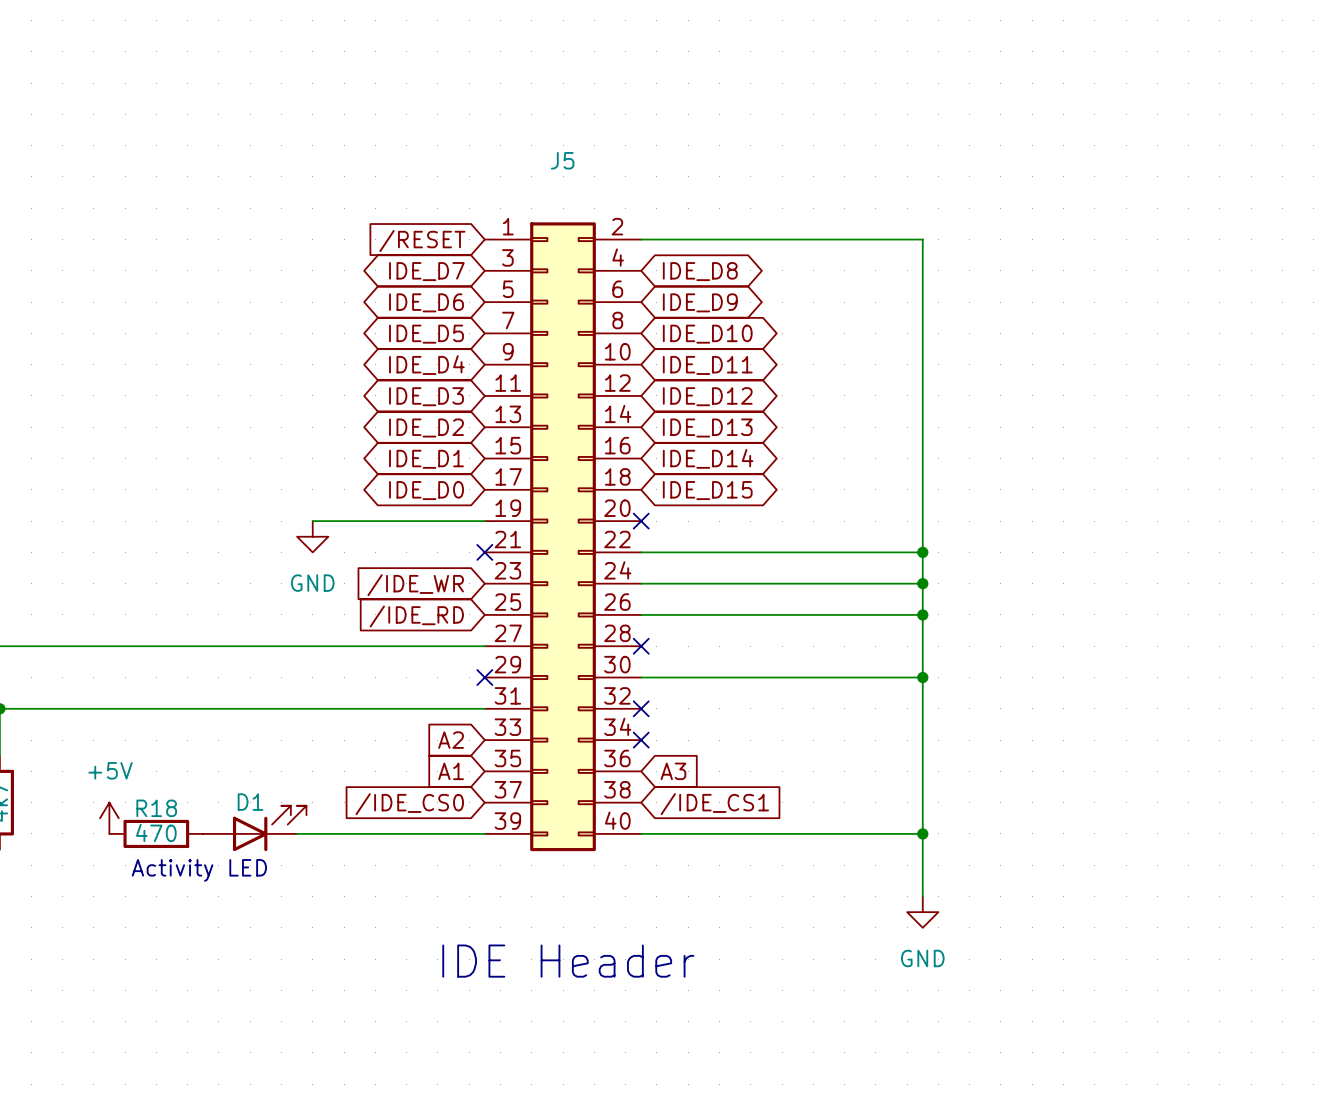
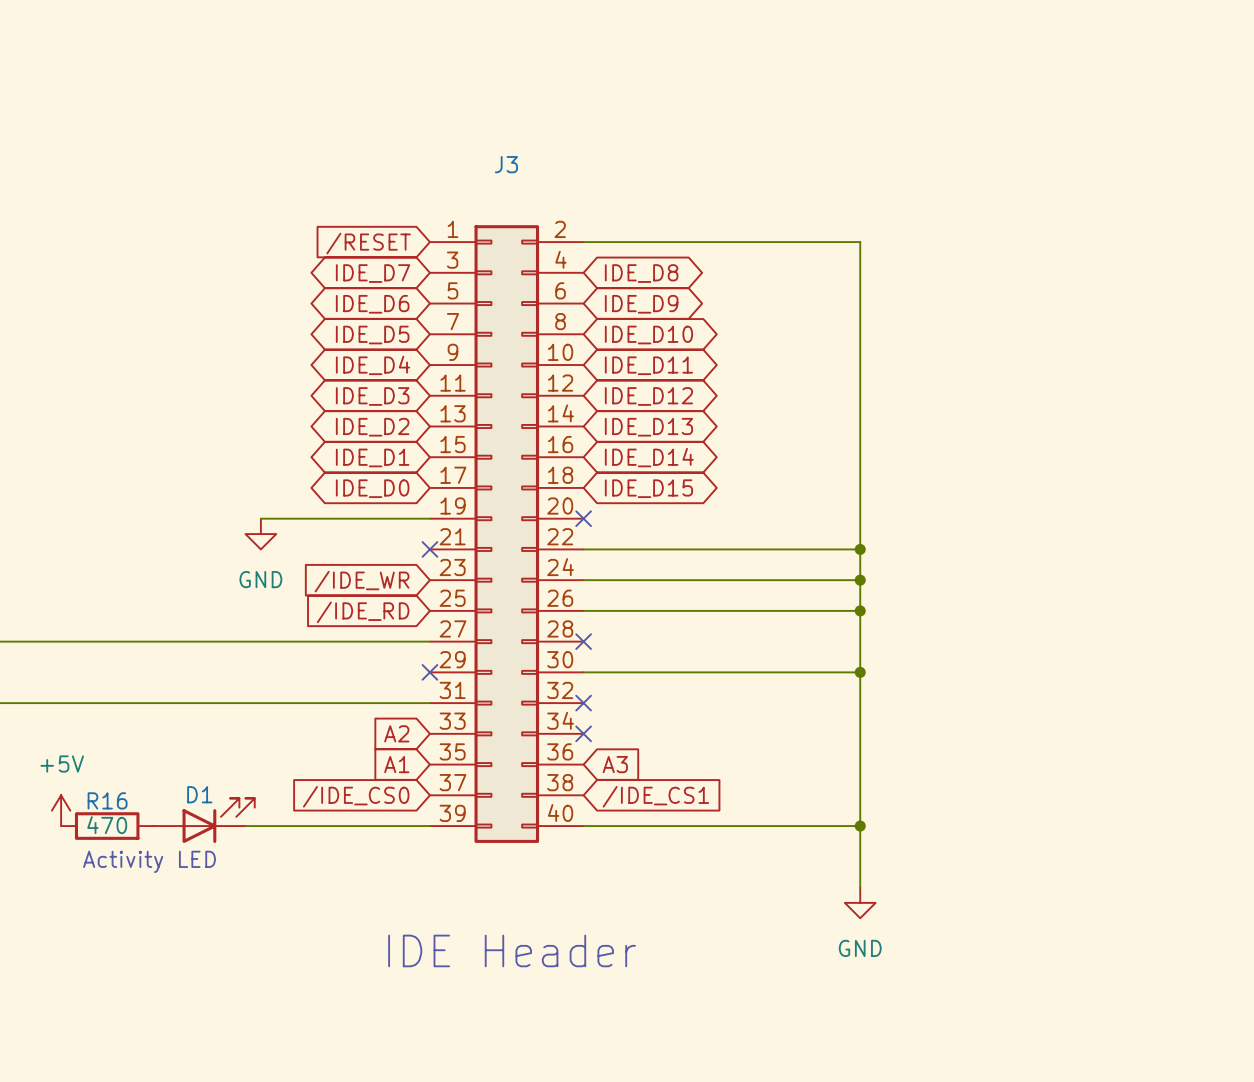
J5 name: J5 (562, 160) -> J3 (506, 164)
R18 name: R18 (156, 808) -> R16 (107, 800)

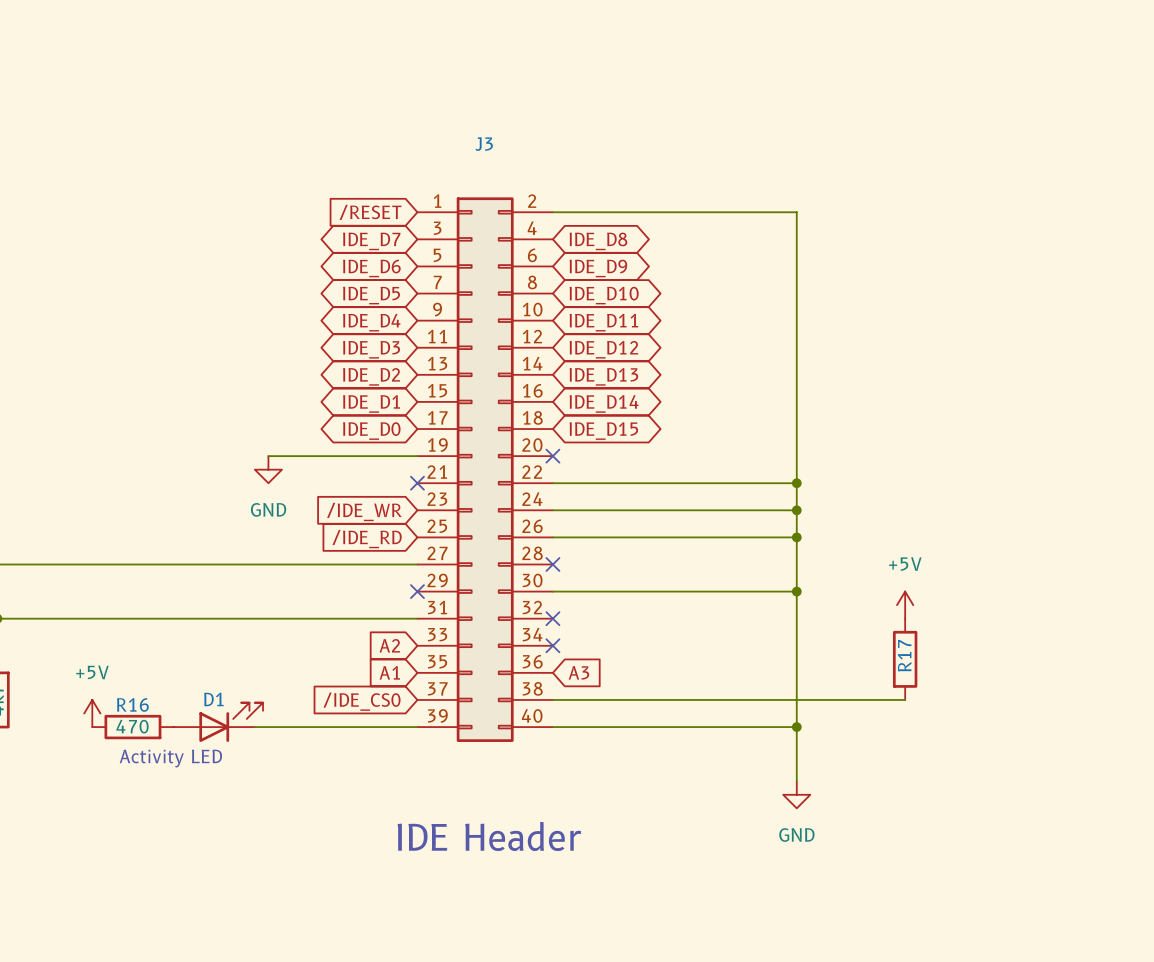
power symbol: none -> +5V (905, 605)
R17: none -> (905, 659)
wire: none -> (552, 699) (905, 699)
global label: /IDE_CS1 (655, 796) -> none

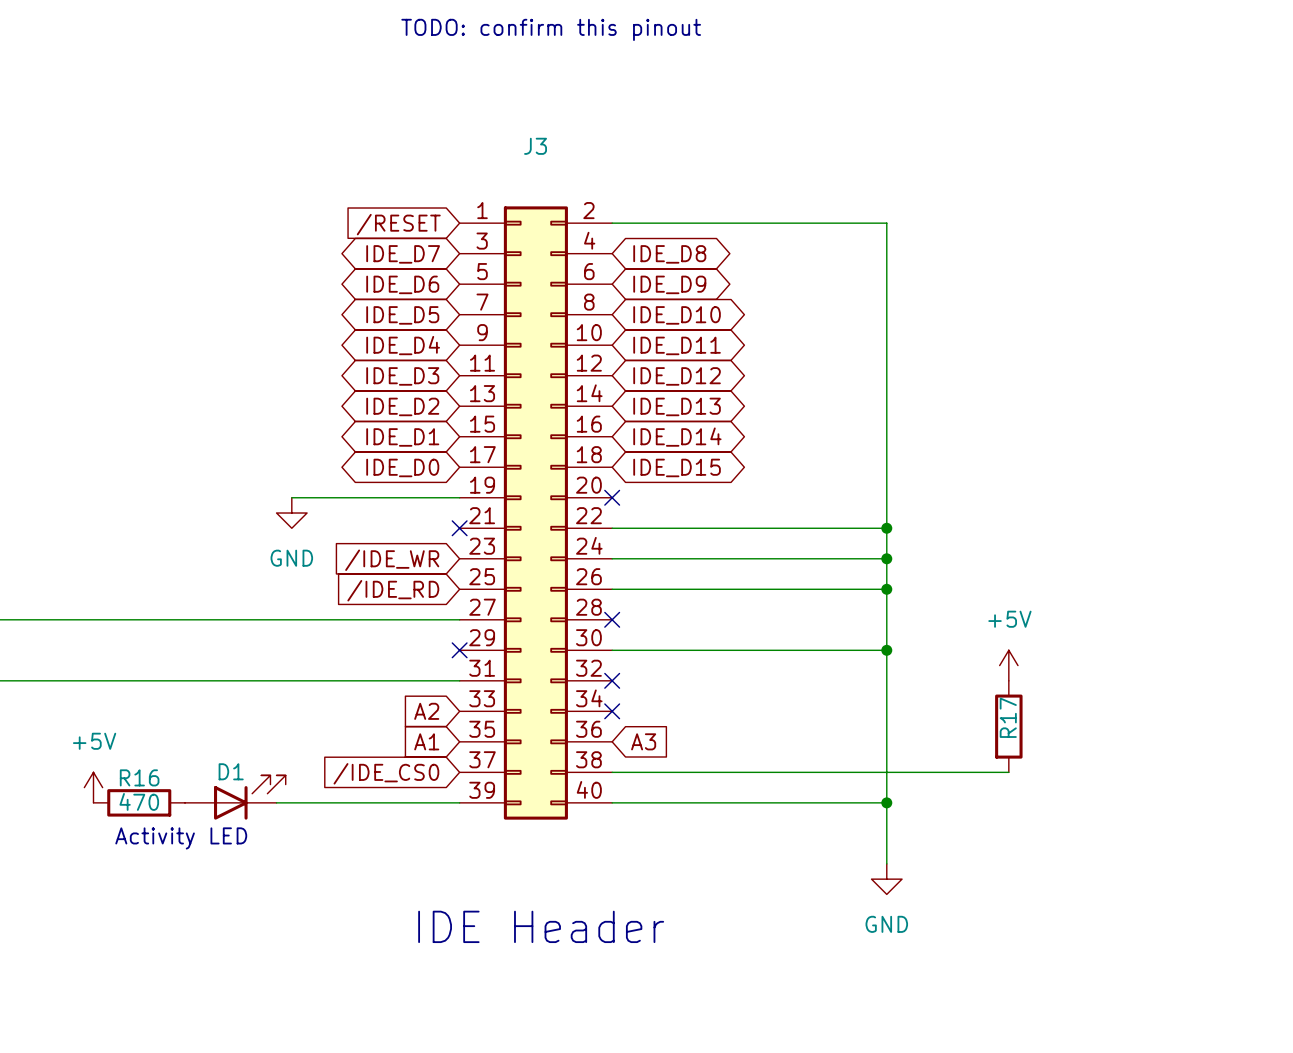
text: none -> TODO: confirm this pinout (551, 29)

